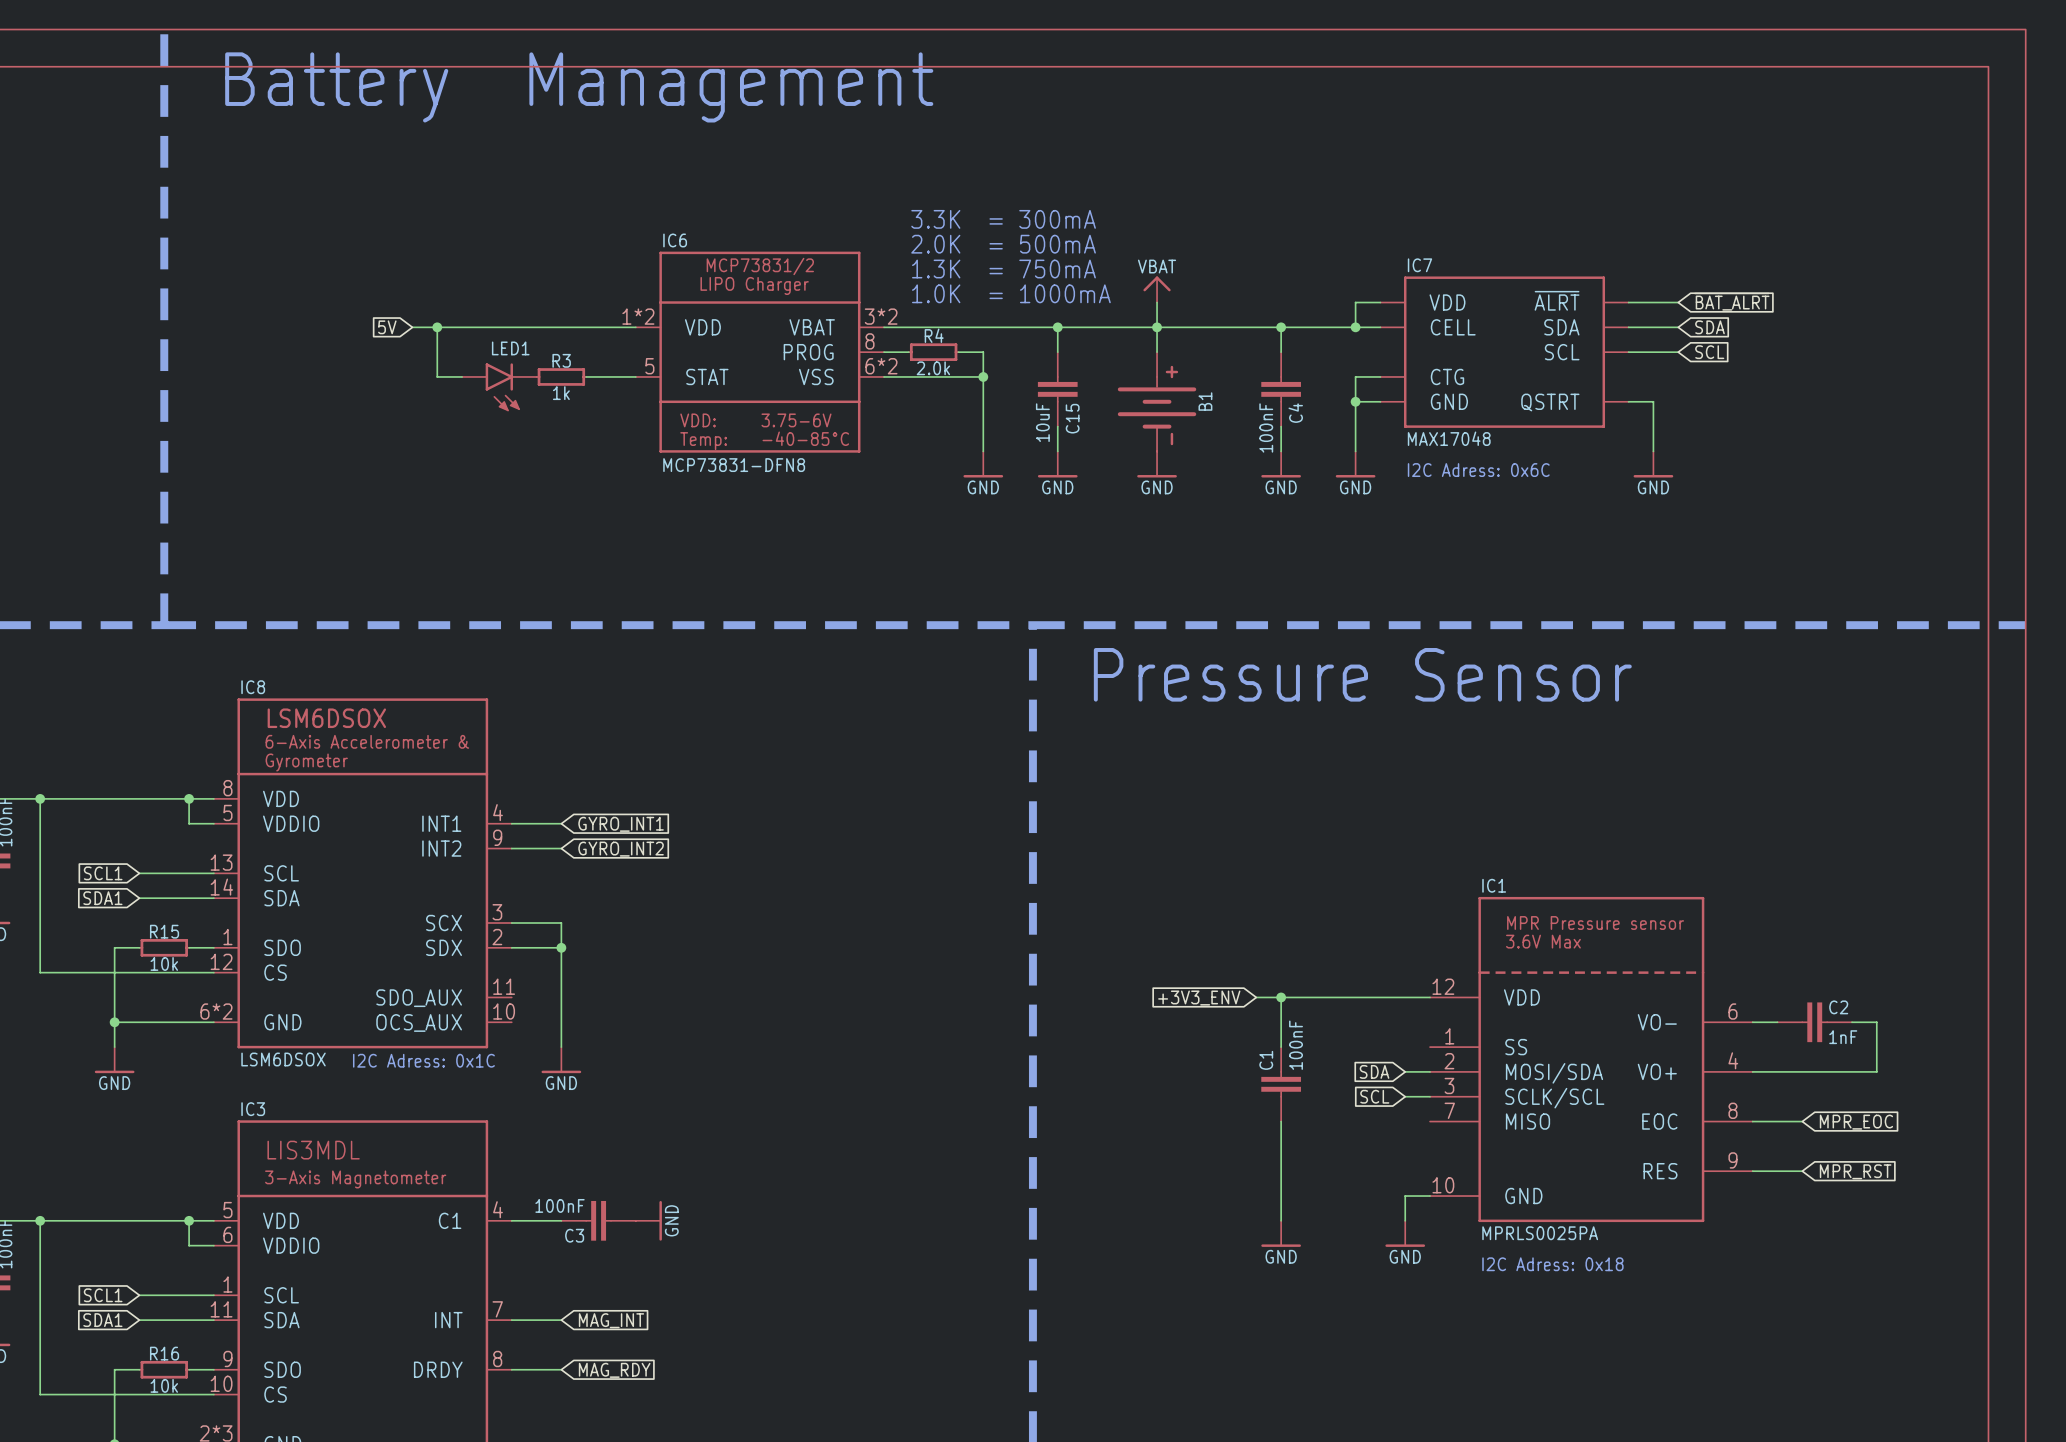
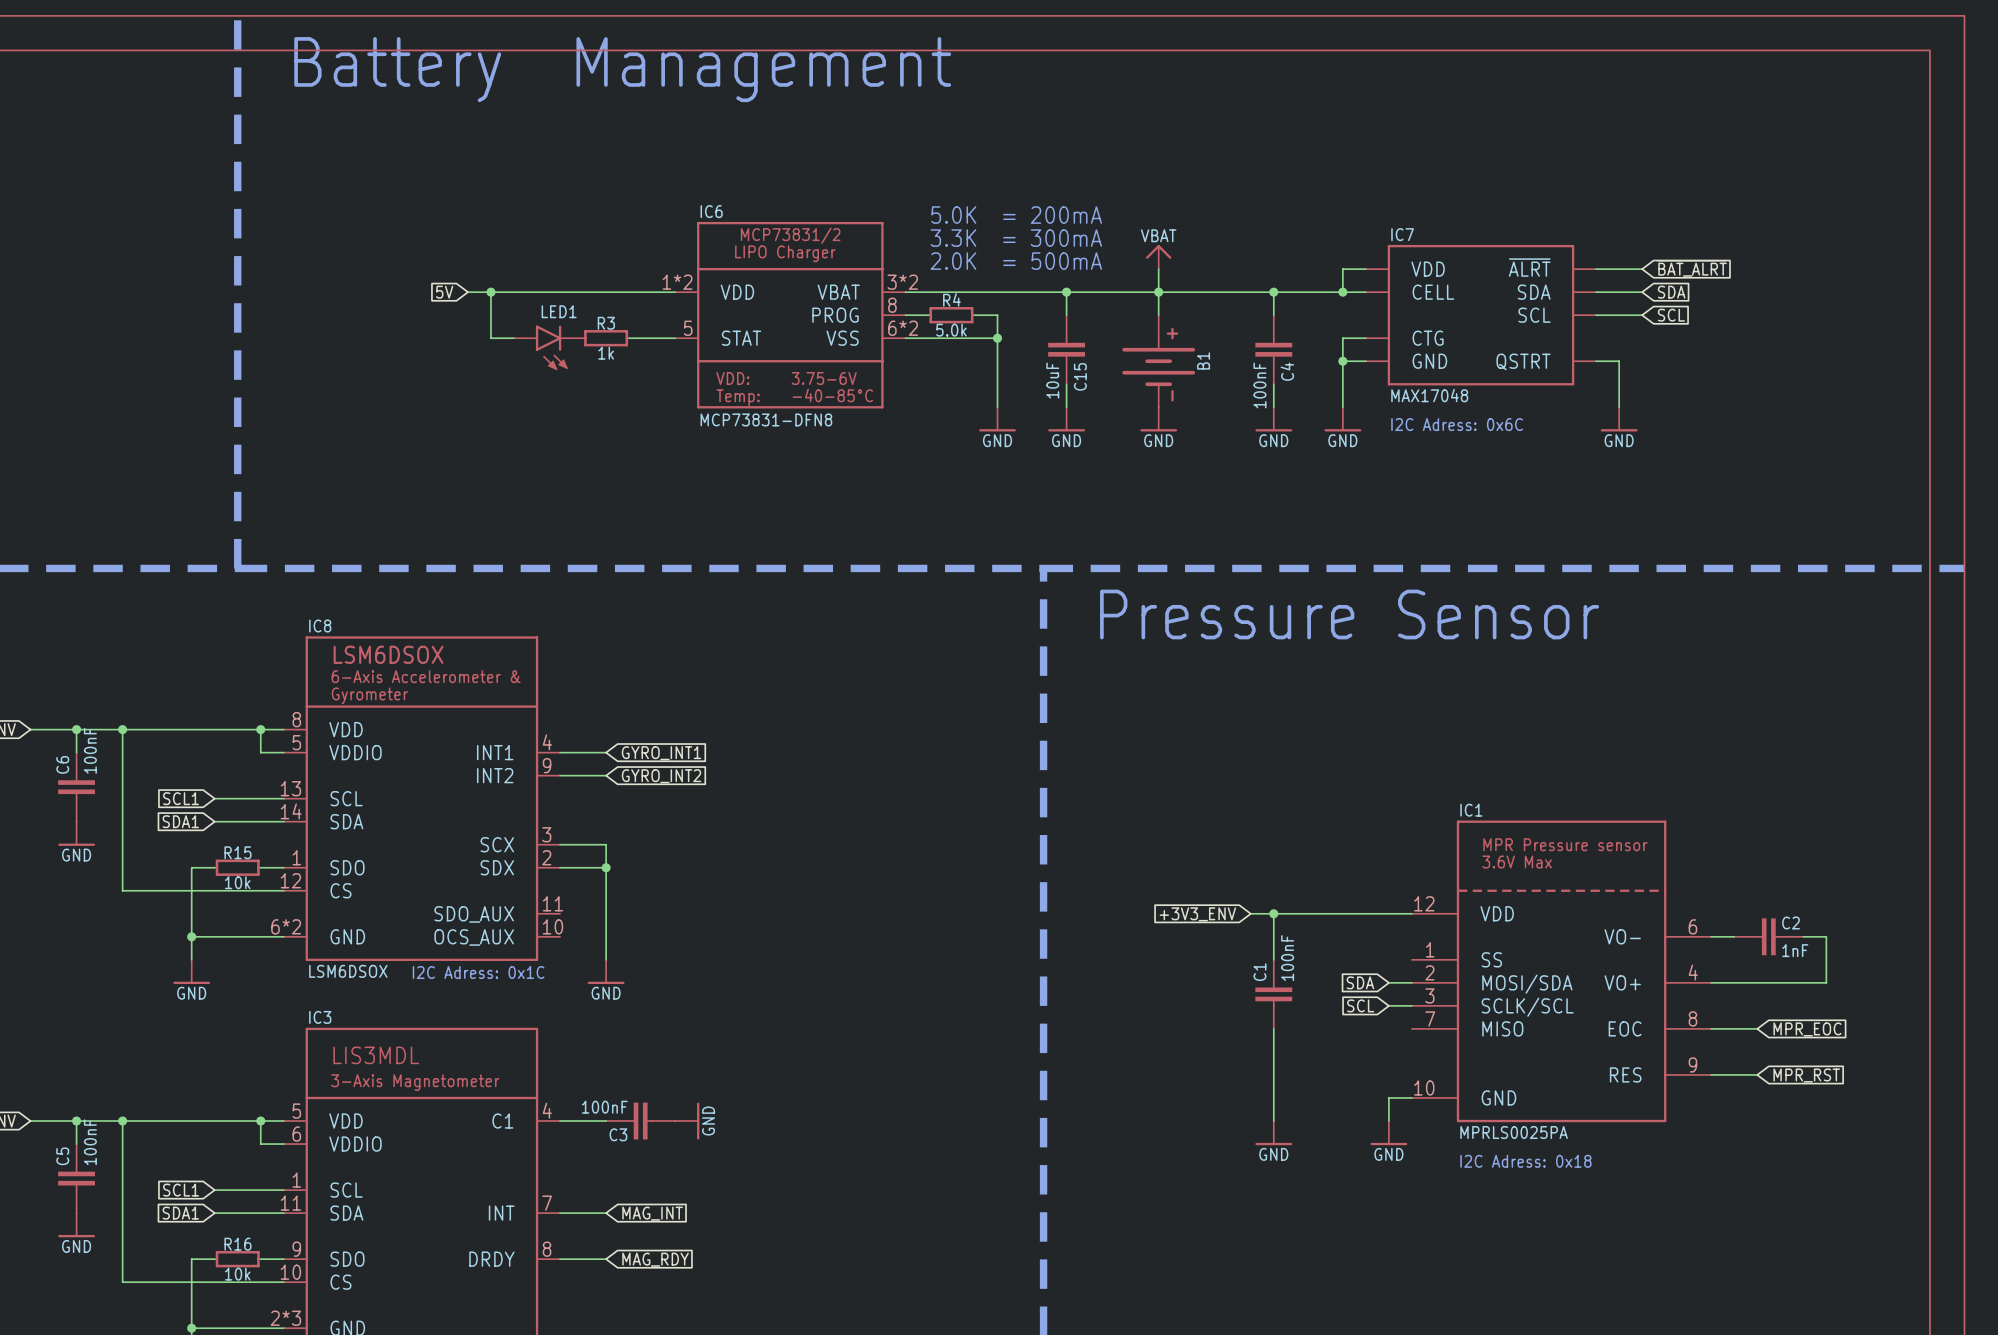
text: 3.3K = 300mA (1003, 219) -> none
text: 2.0K = 500mA (1003, 244) -> 5.0K = 200mA (1016, 215)
text: 1.3K = 750mA (1003, 269) -> 3.3K = 300mA (1016, 238)
text: 1.0K = 1000mA (1011, 293) -> 2.0K = 500mA (1016, 261)
R4 value: 2.0k (933, 368) -> 5.0k (951, 330)

